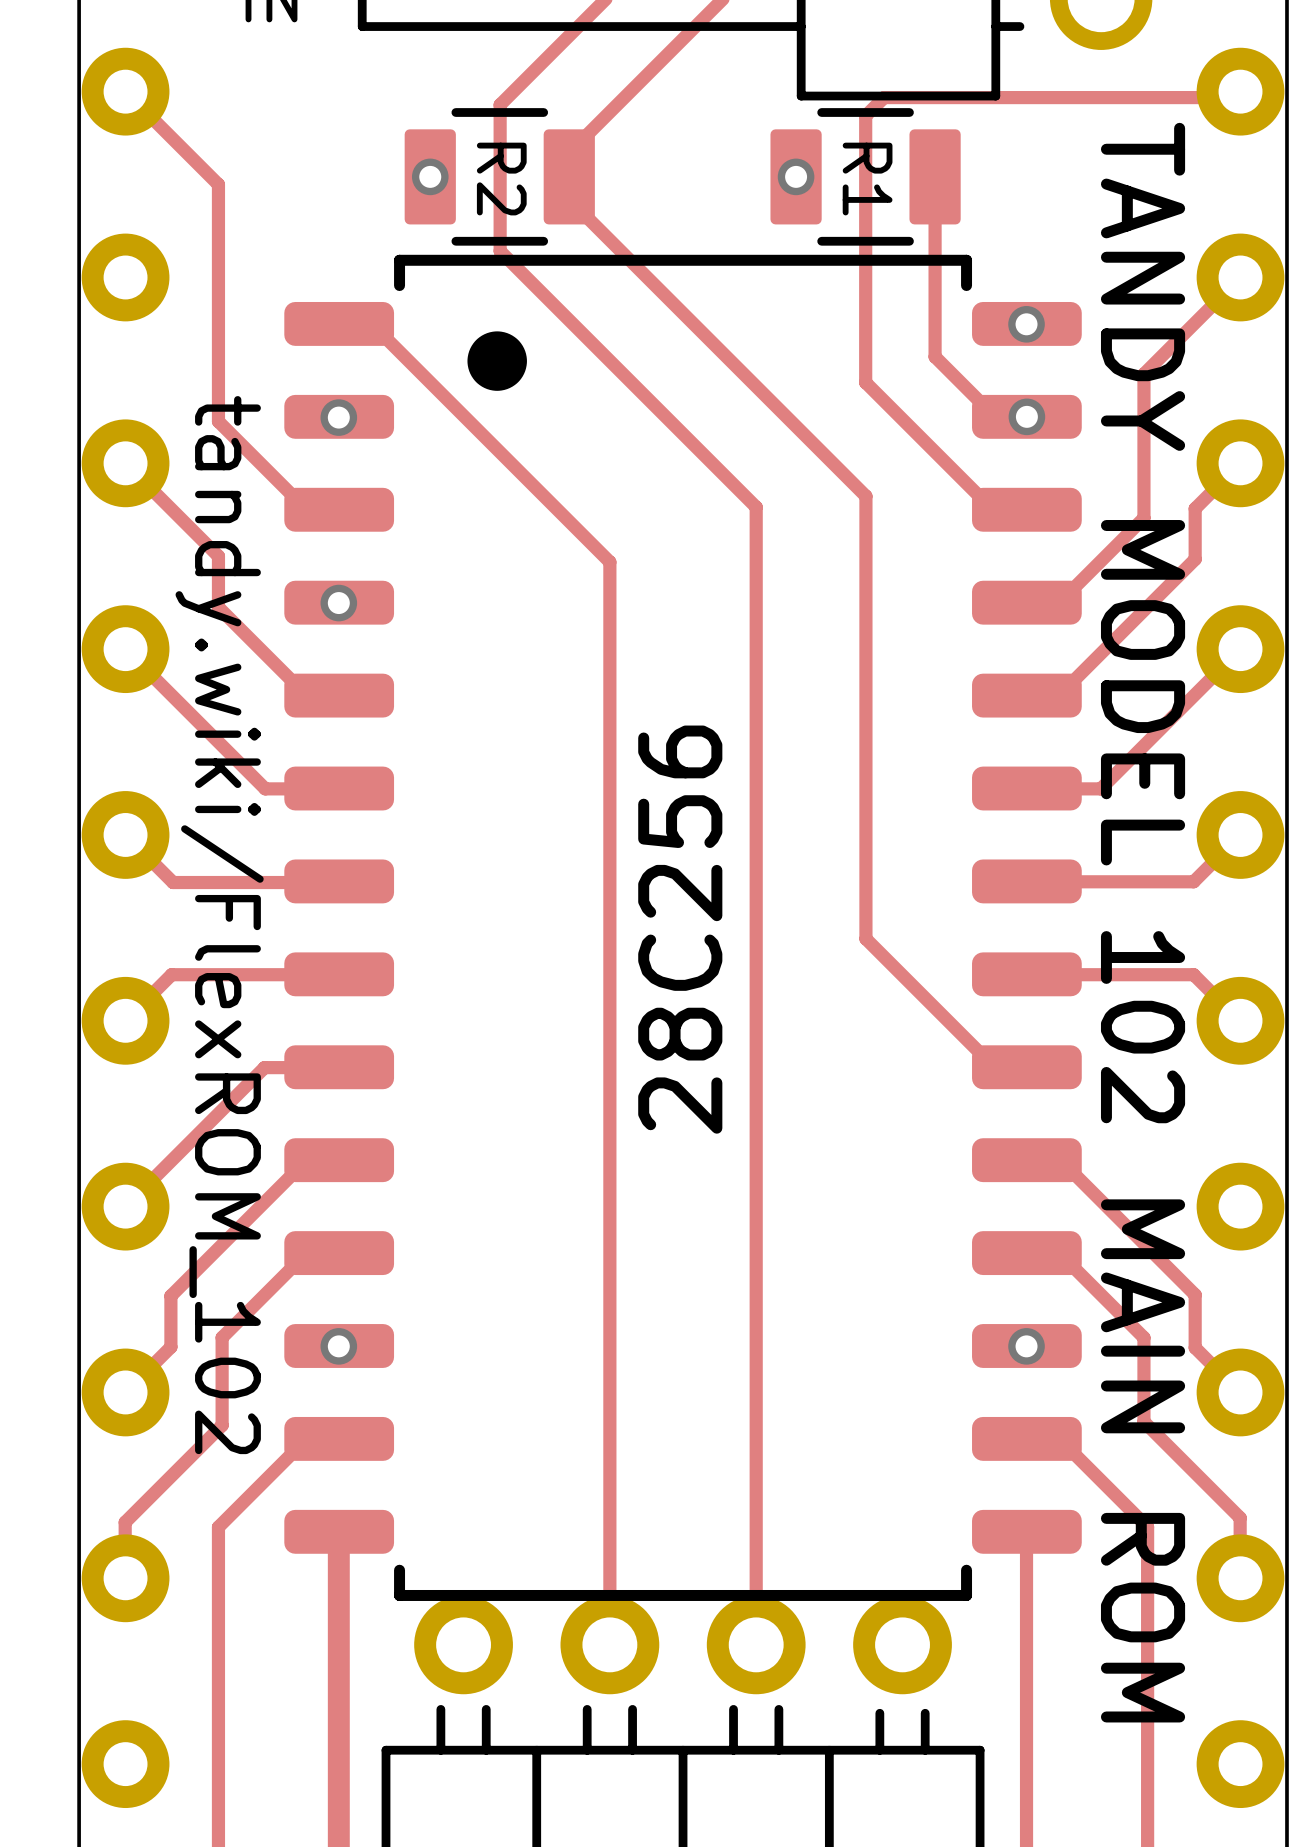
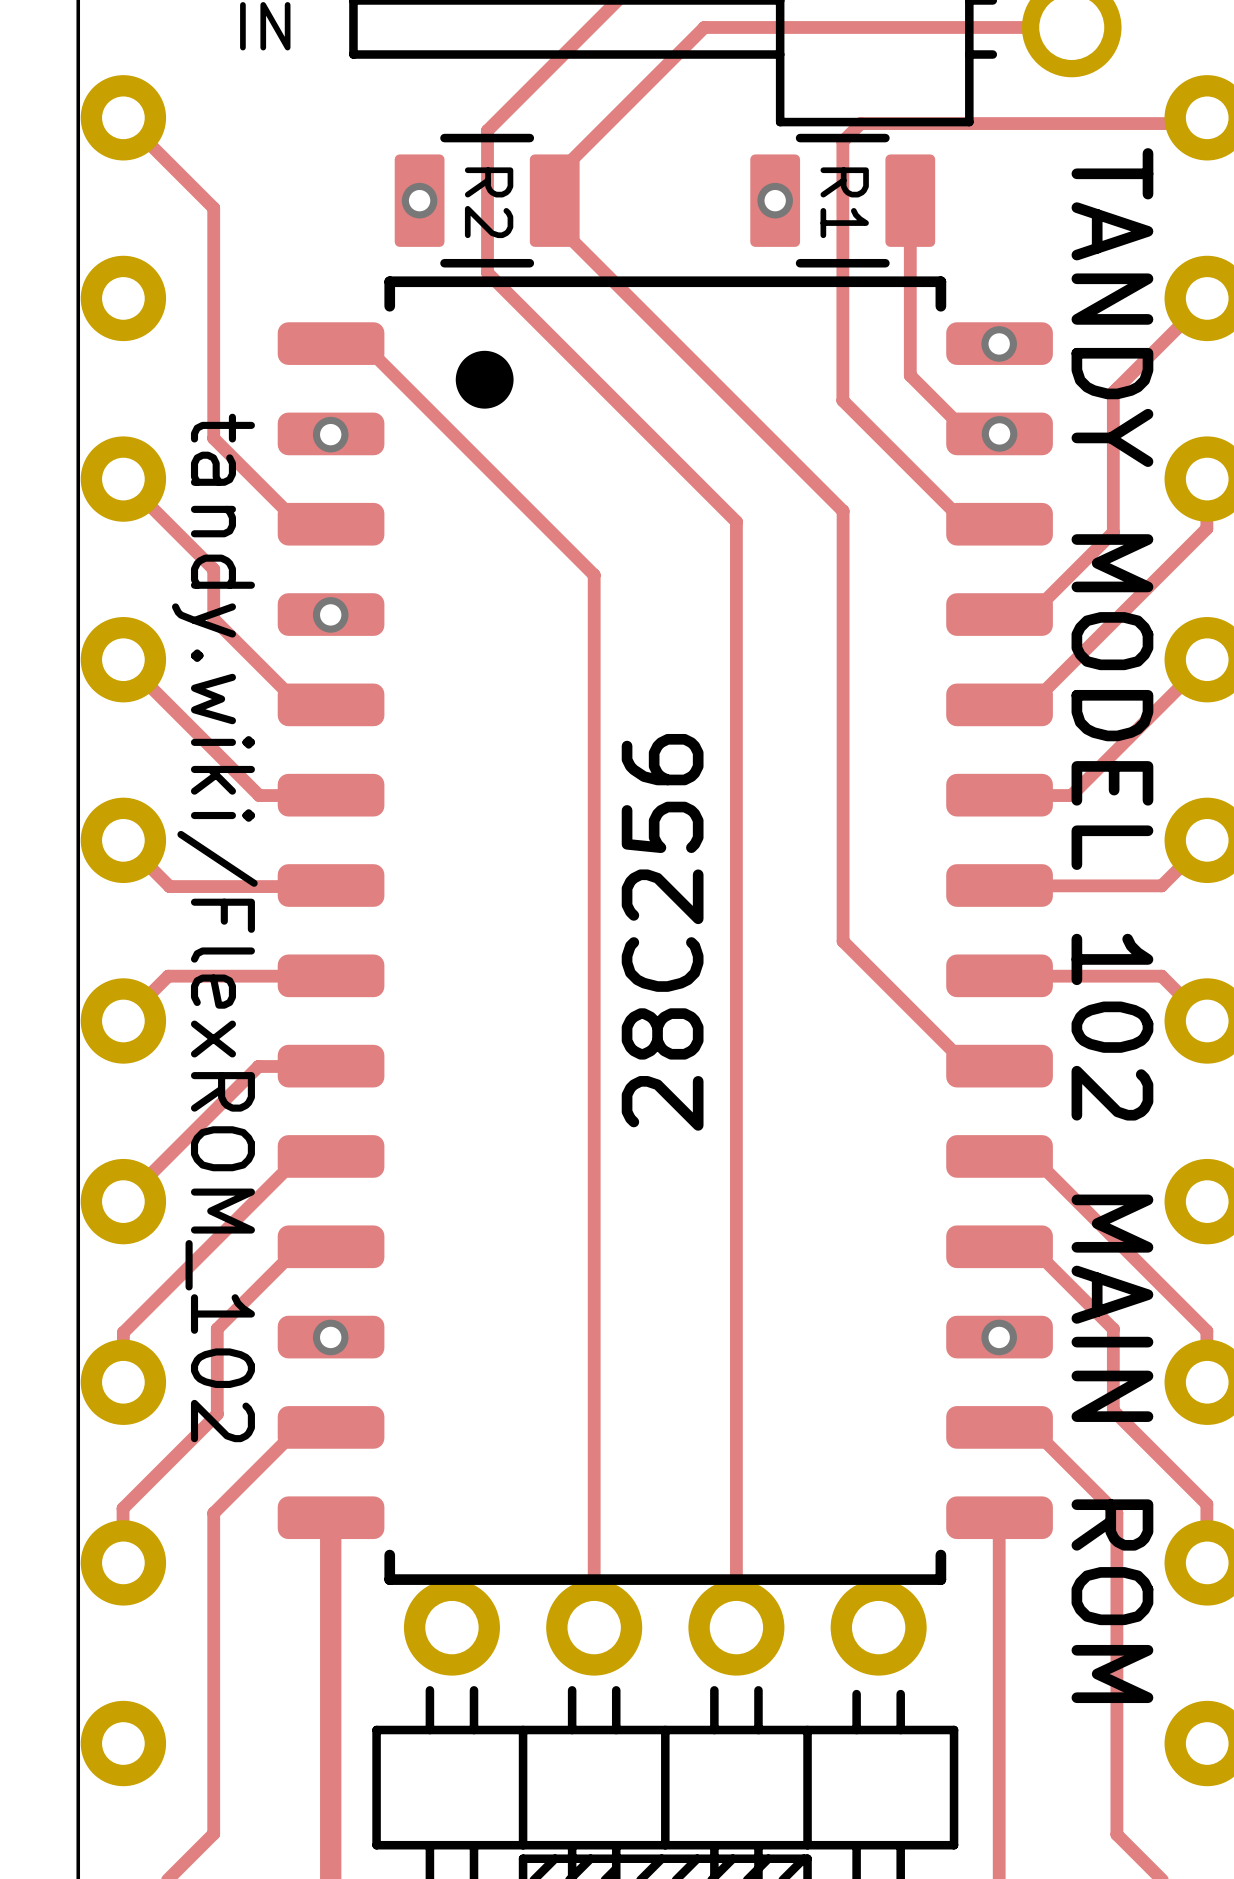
track: (1240, 463) (1195, 508) (1195, 559) -> (1206, 479) (1206, 528) (1163, 572)
track: (1195, 1294) (1195, 1347) (1240, 1392) -> (1163, 1287) (1206, 1331) (1206, 1382)
track: (170, 1295) (170, 1347) (125, 1392) -> (167, 1288) (123, 1332) (123, 1382)

